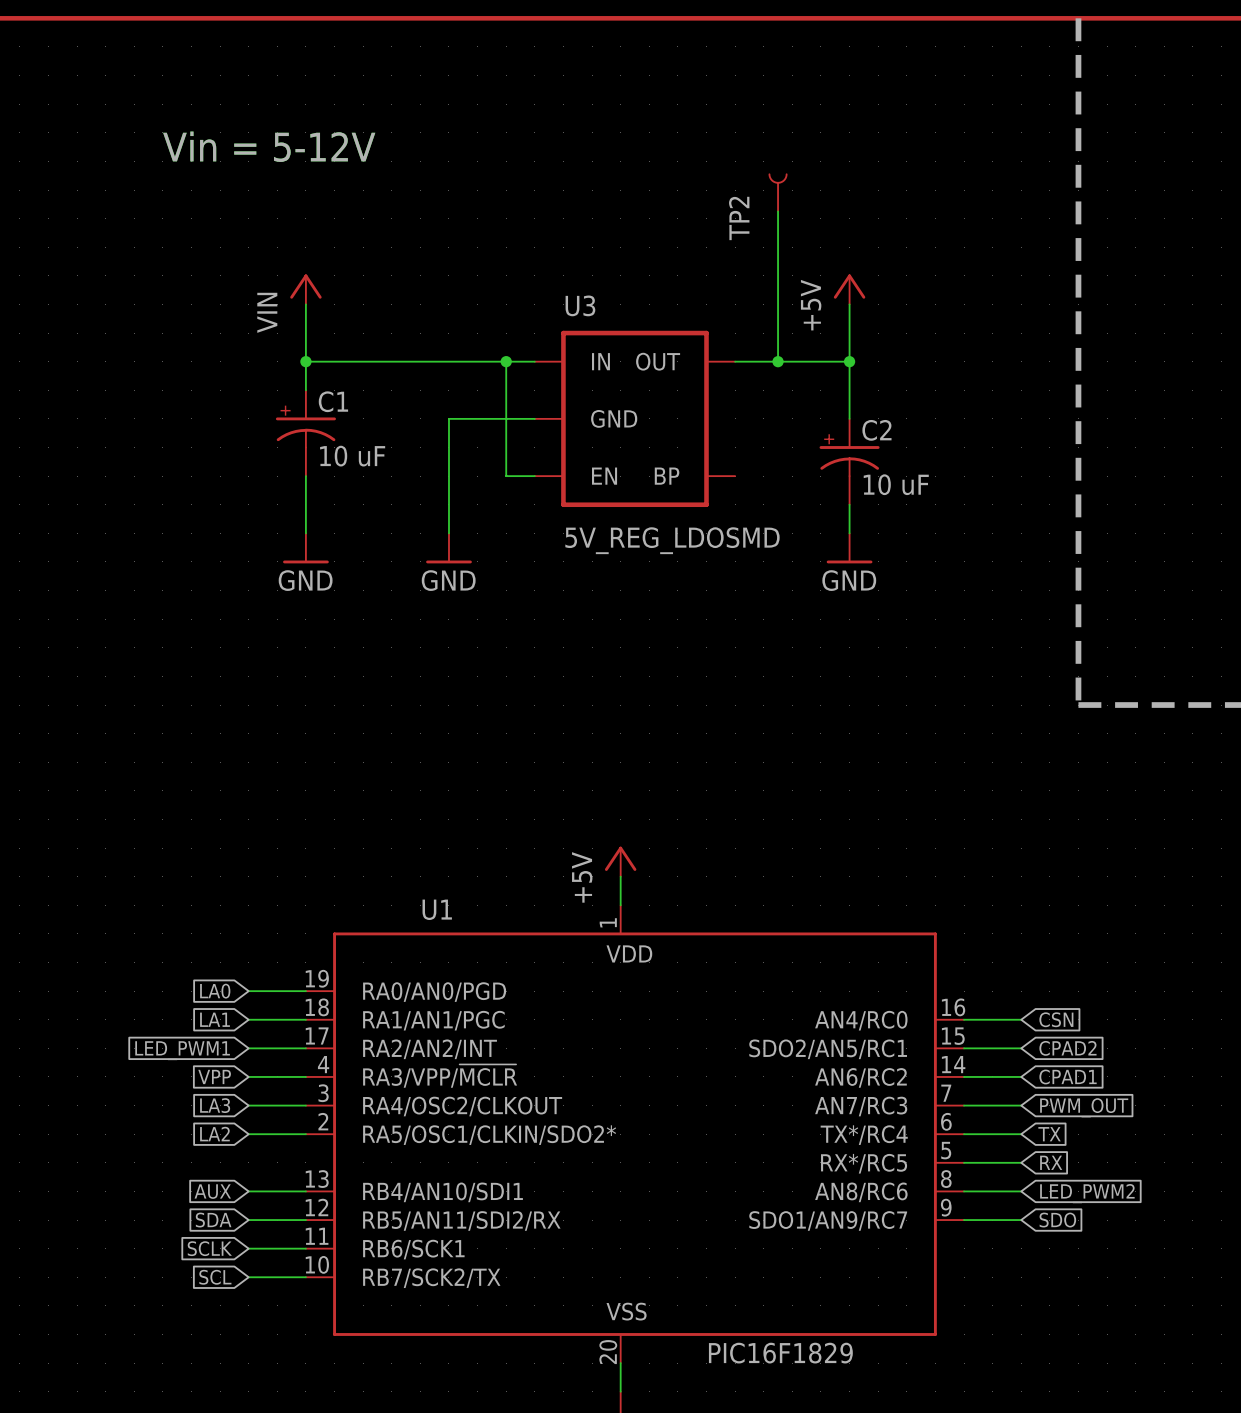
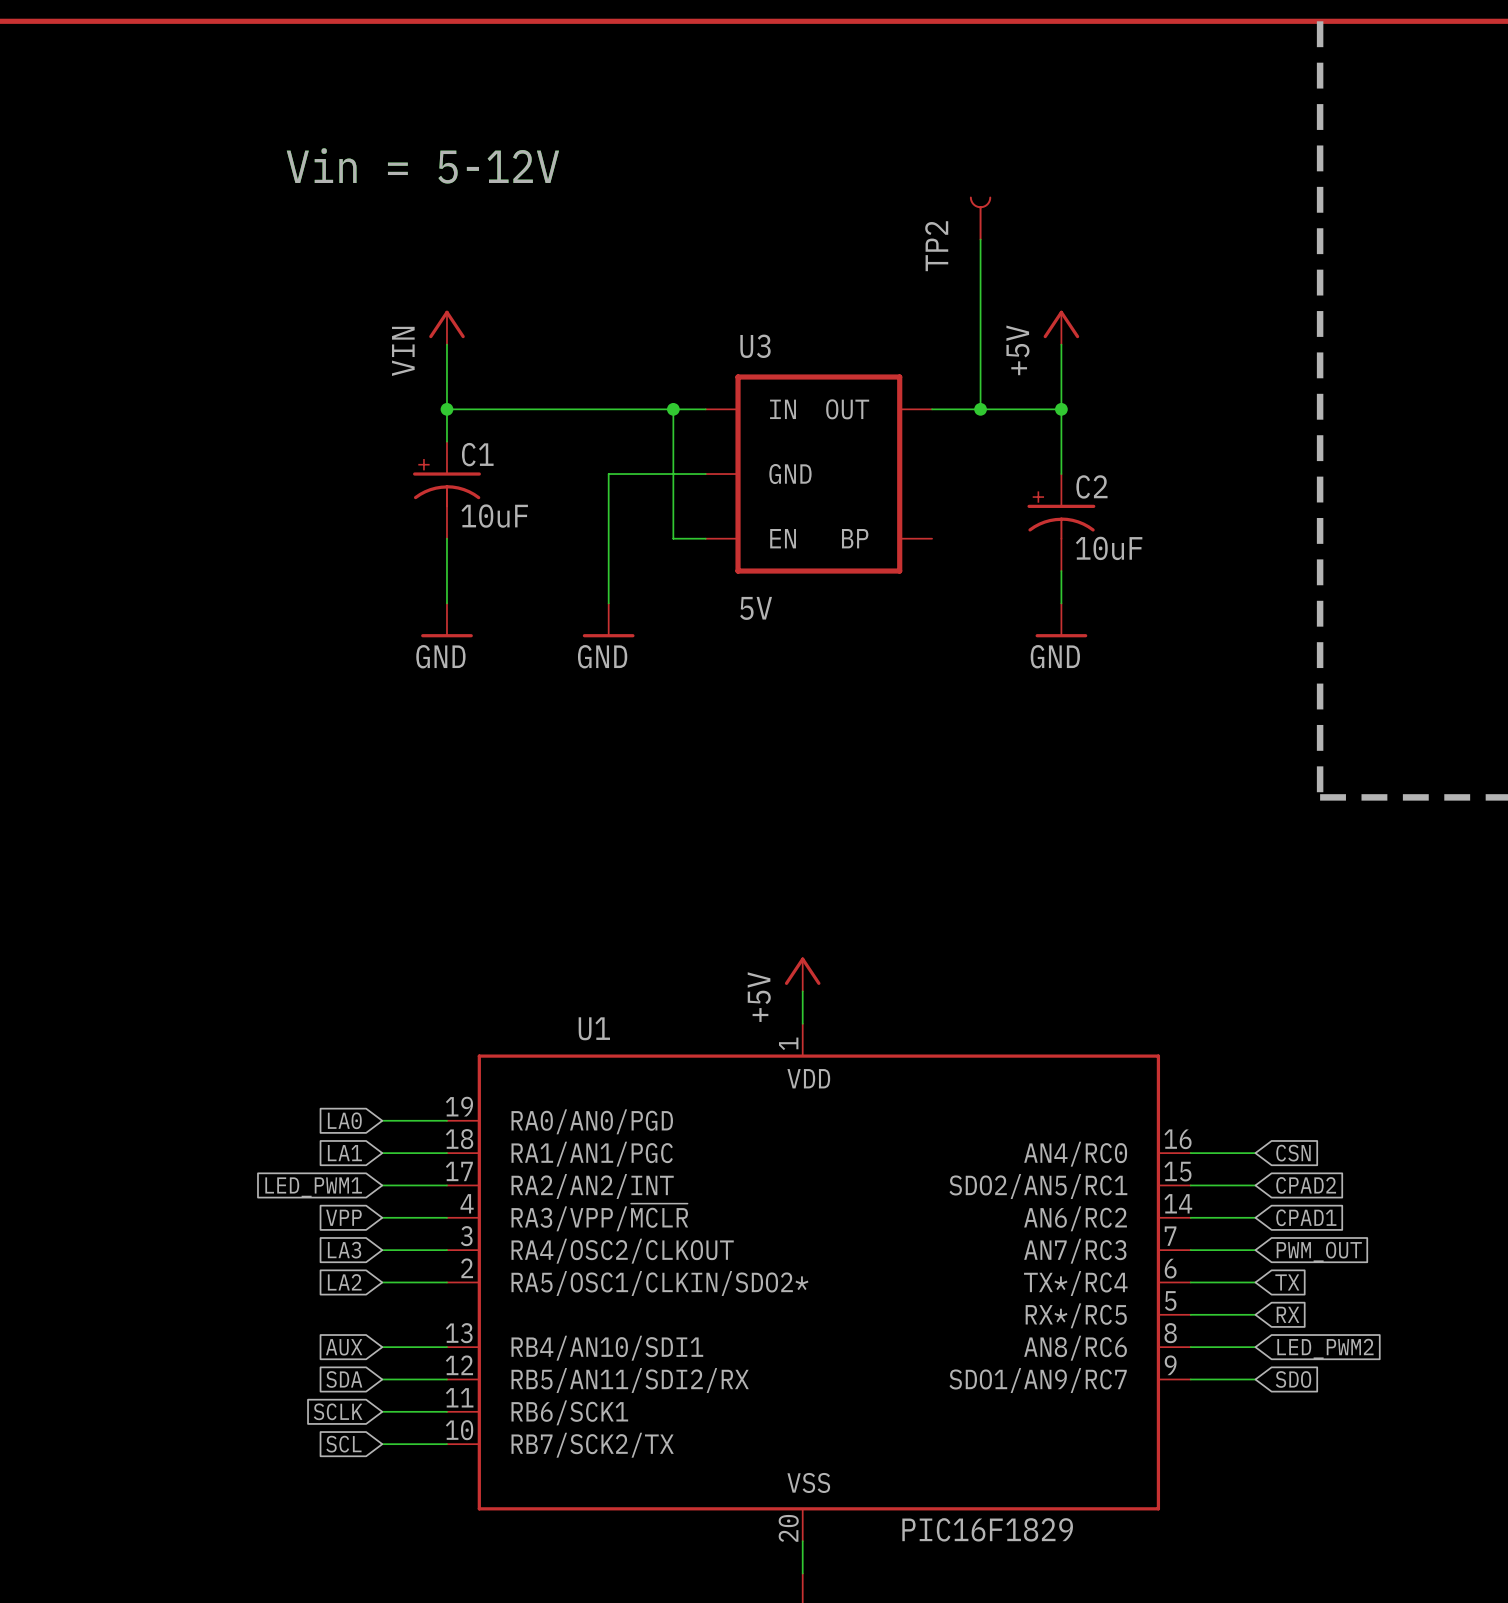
C1 value: 10 uF (352, 456) -> 10uF (494, 516)
C2 value: 10 uF (896, 484) -> 10uF (1109, 548)
U3 value: 5V_REG_LDOSMD (672, 540) -> 5V (756, 608)

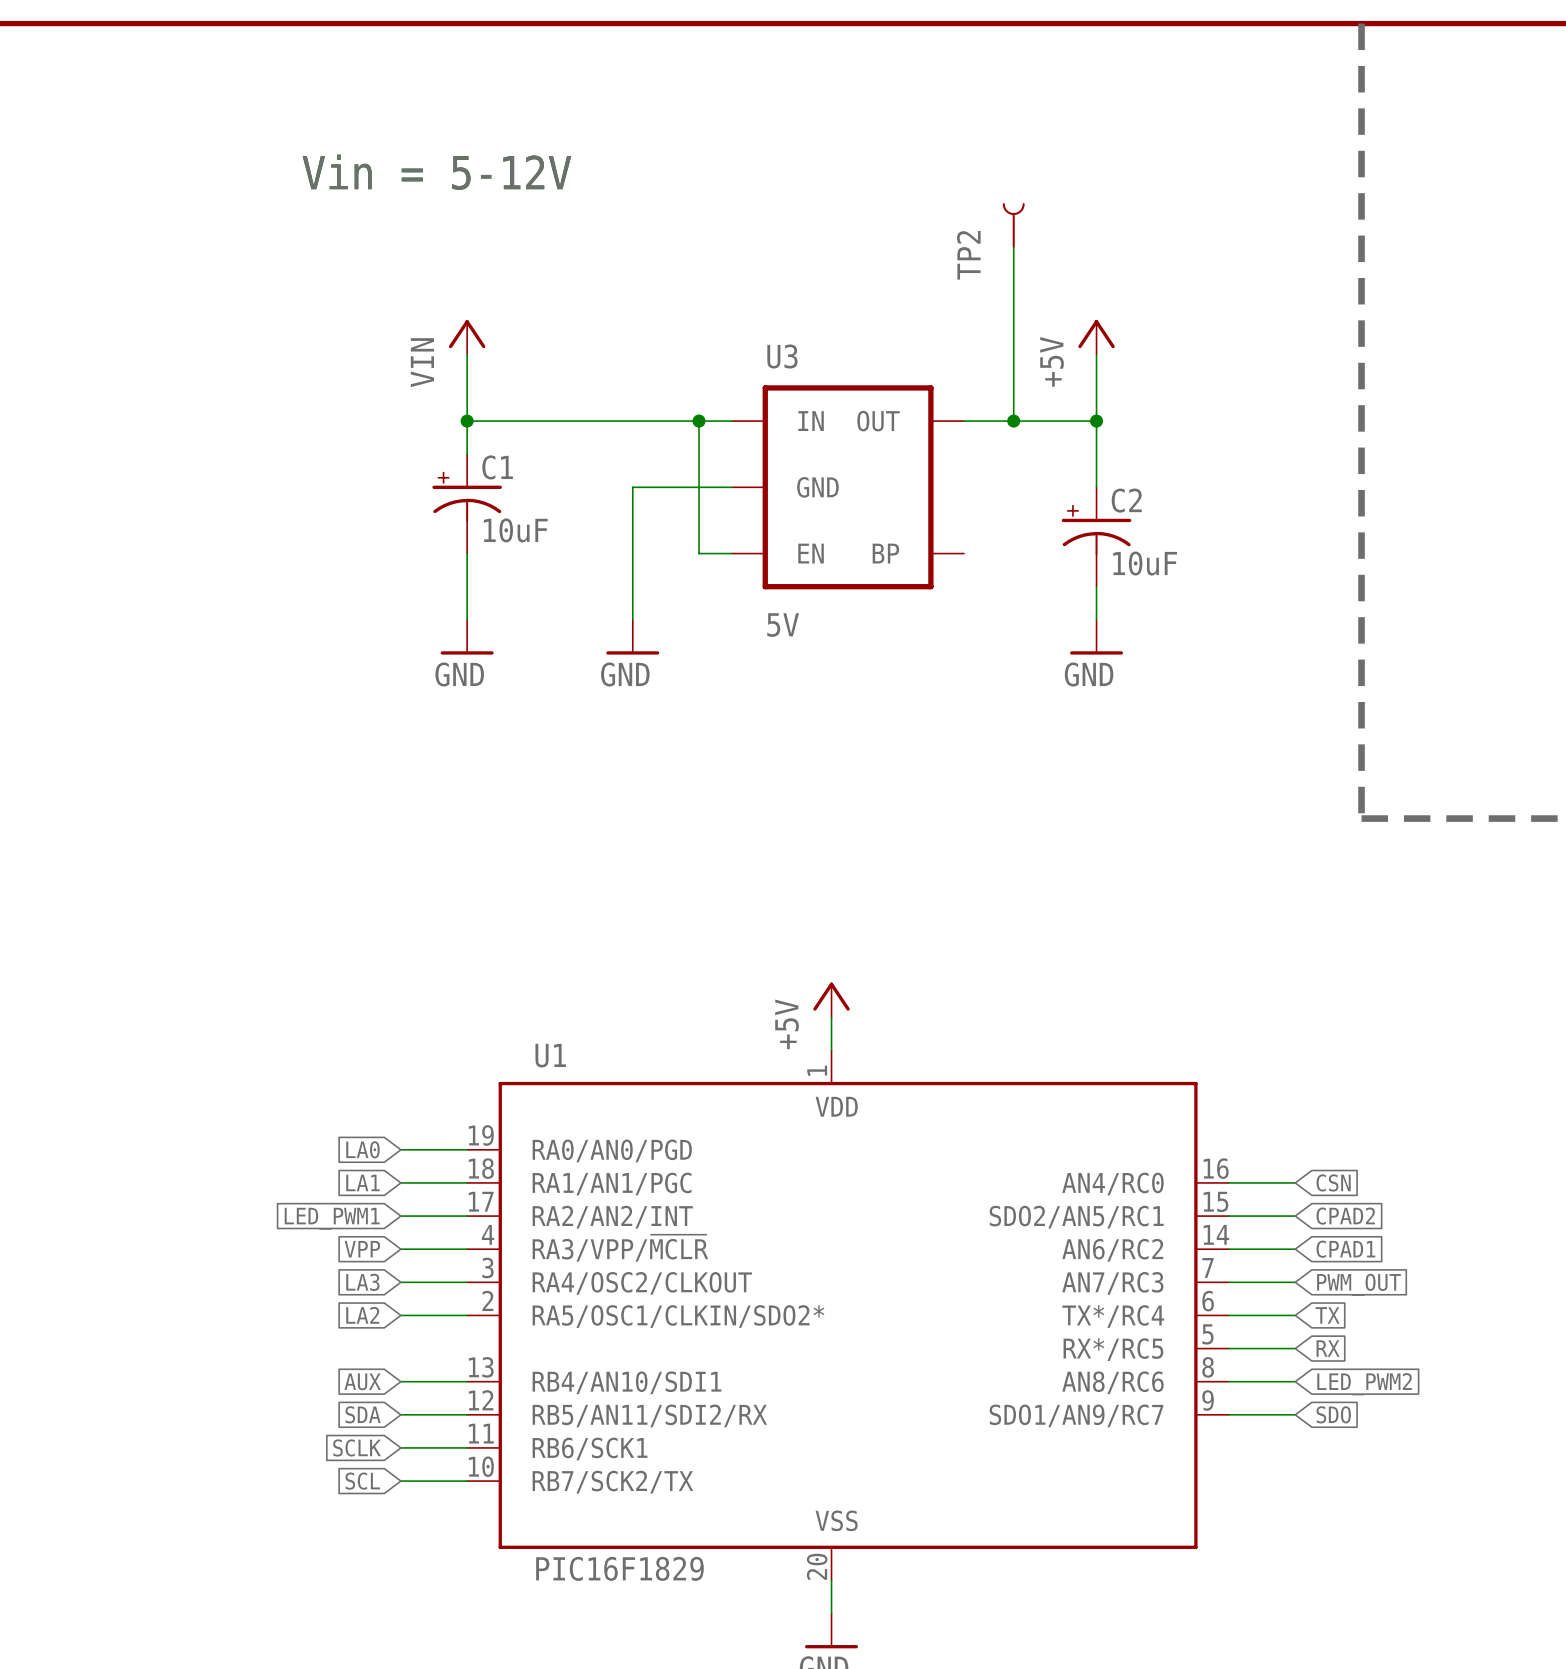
U1 name position: U1 (594, 1028) -> U1 (550, 1055)
U1 value position: PIC16F1829 (987, 1529) -> PIC16F1829 (619, 1568)

